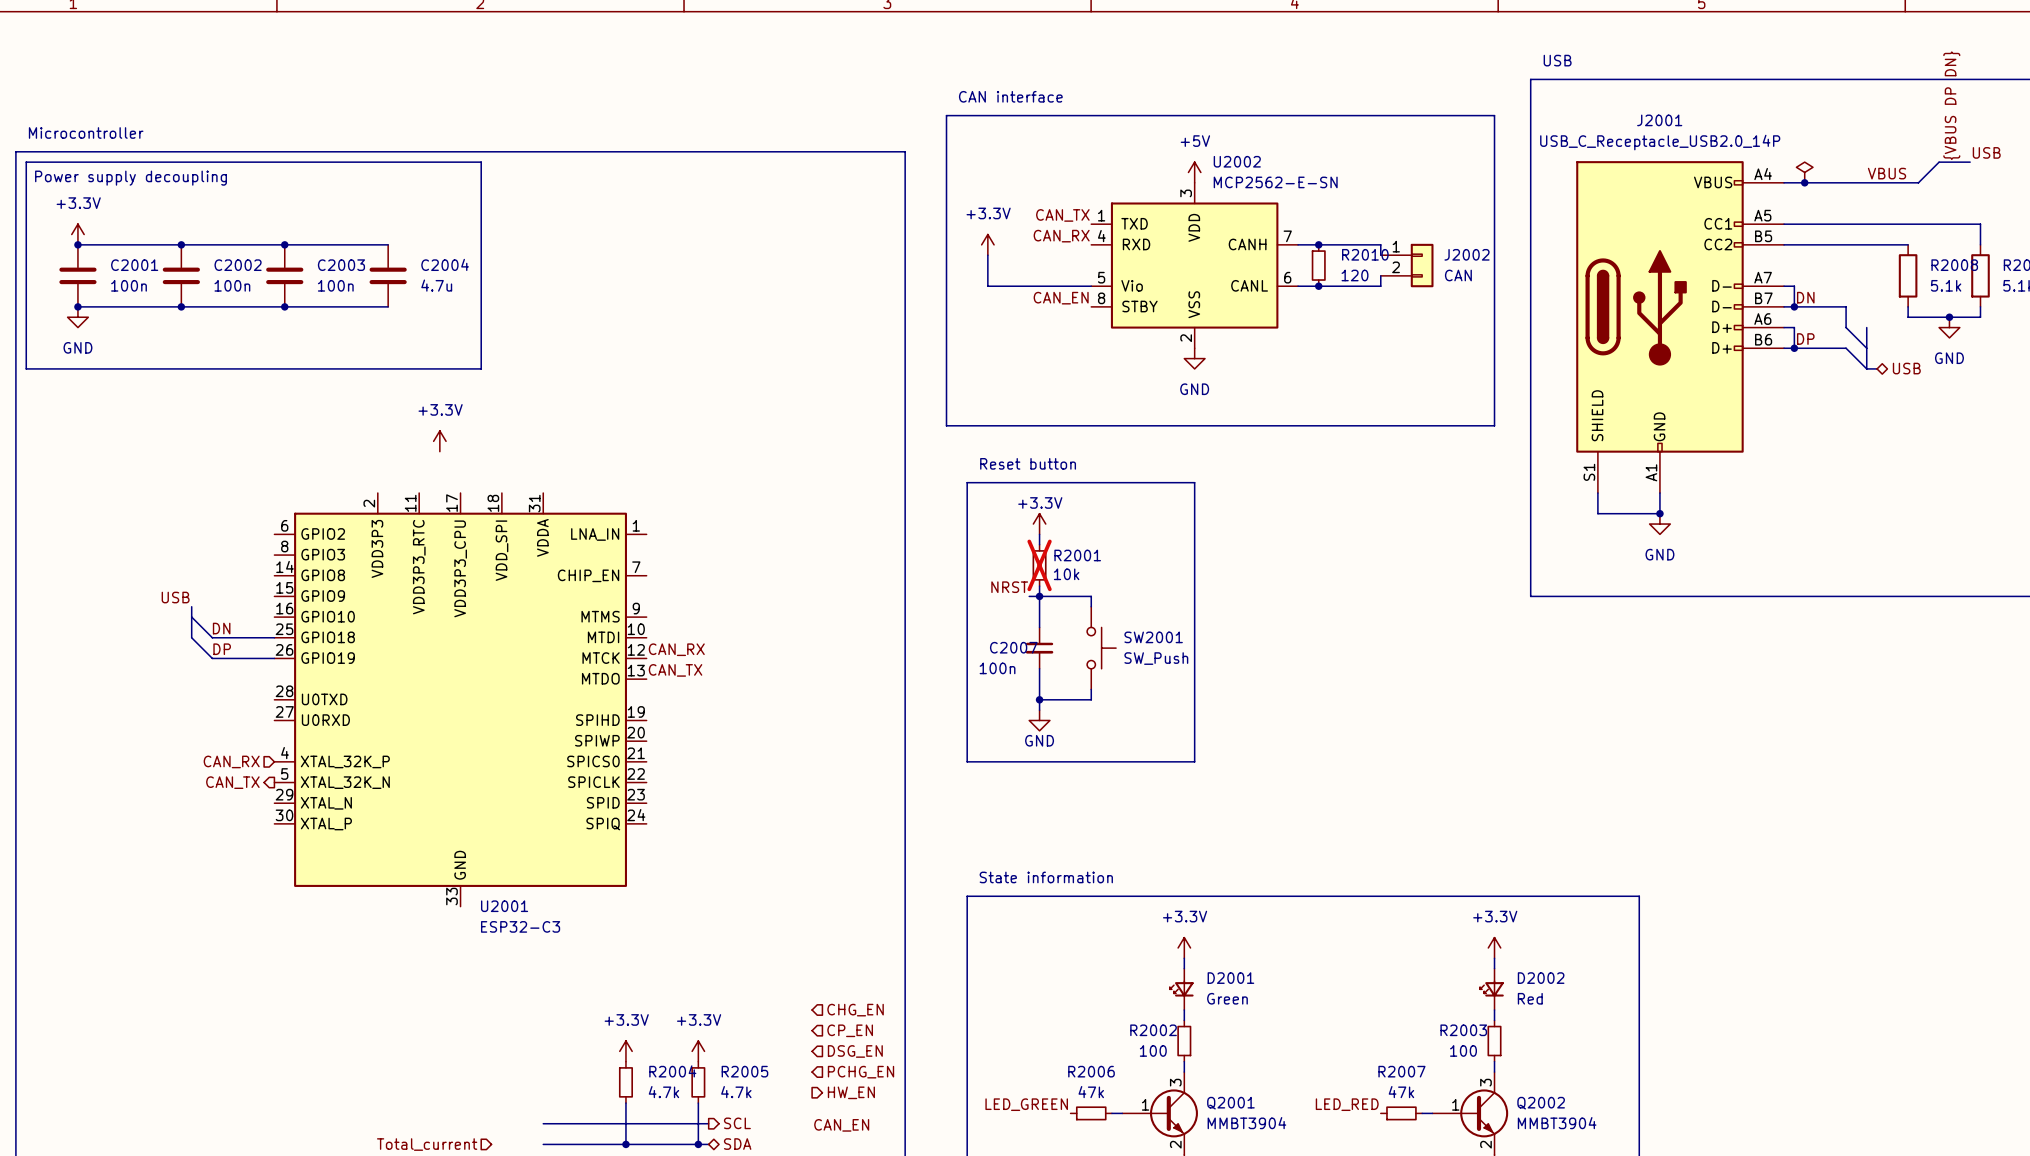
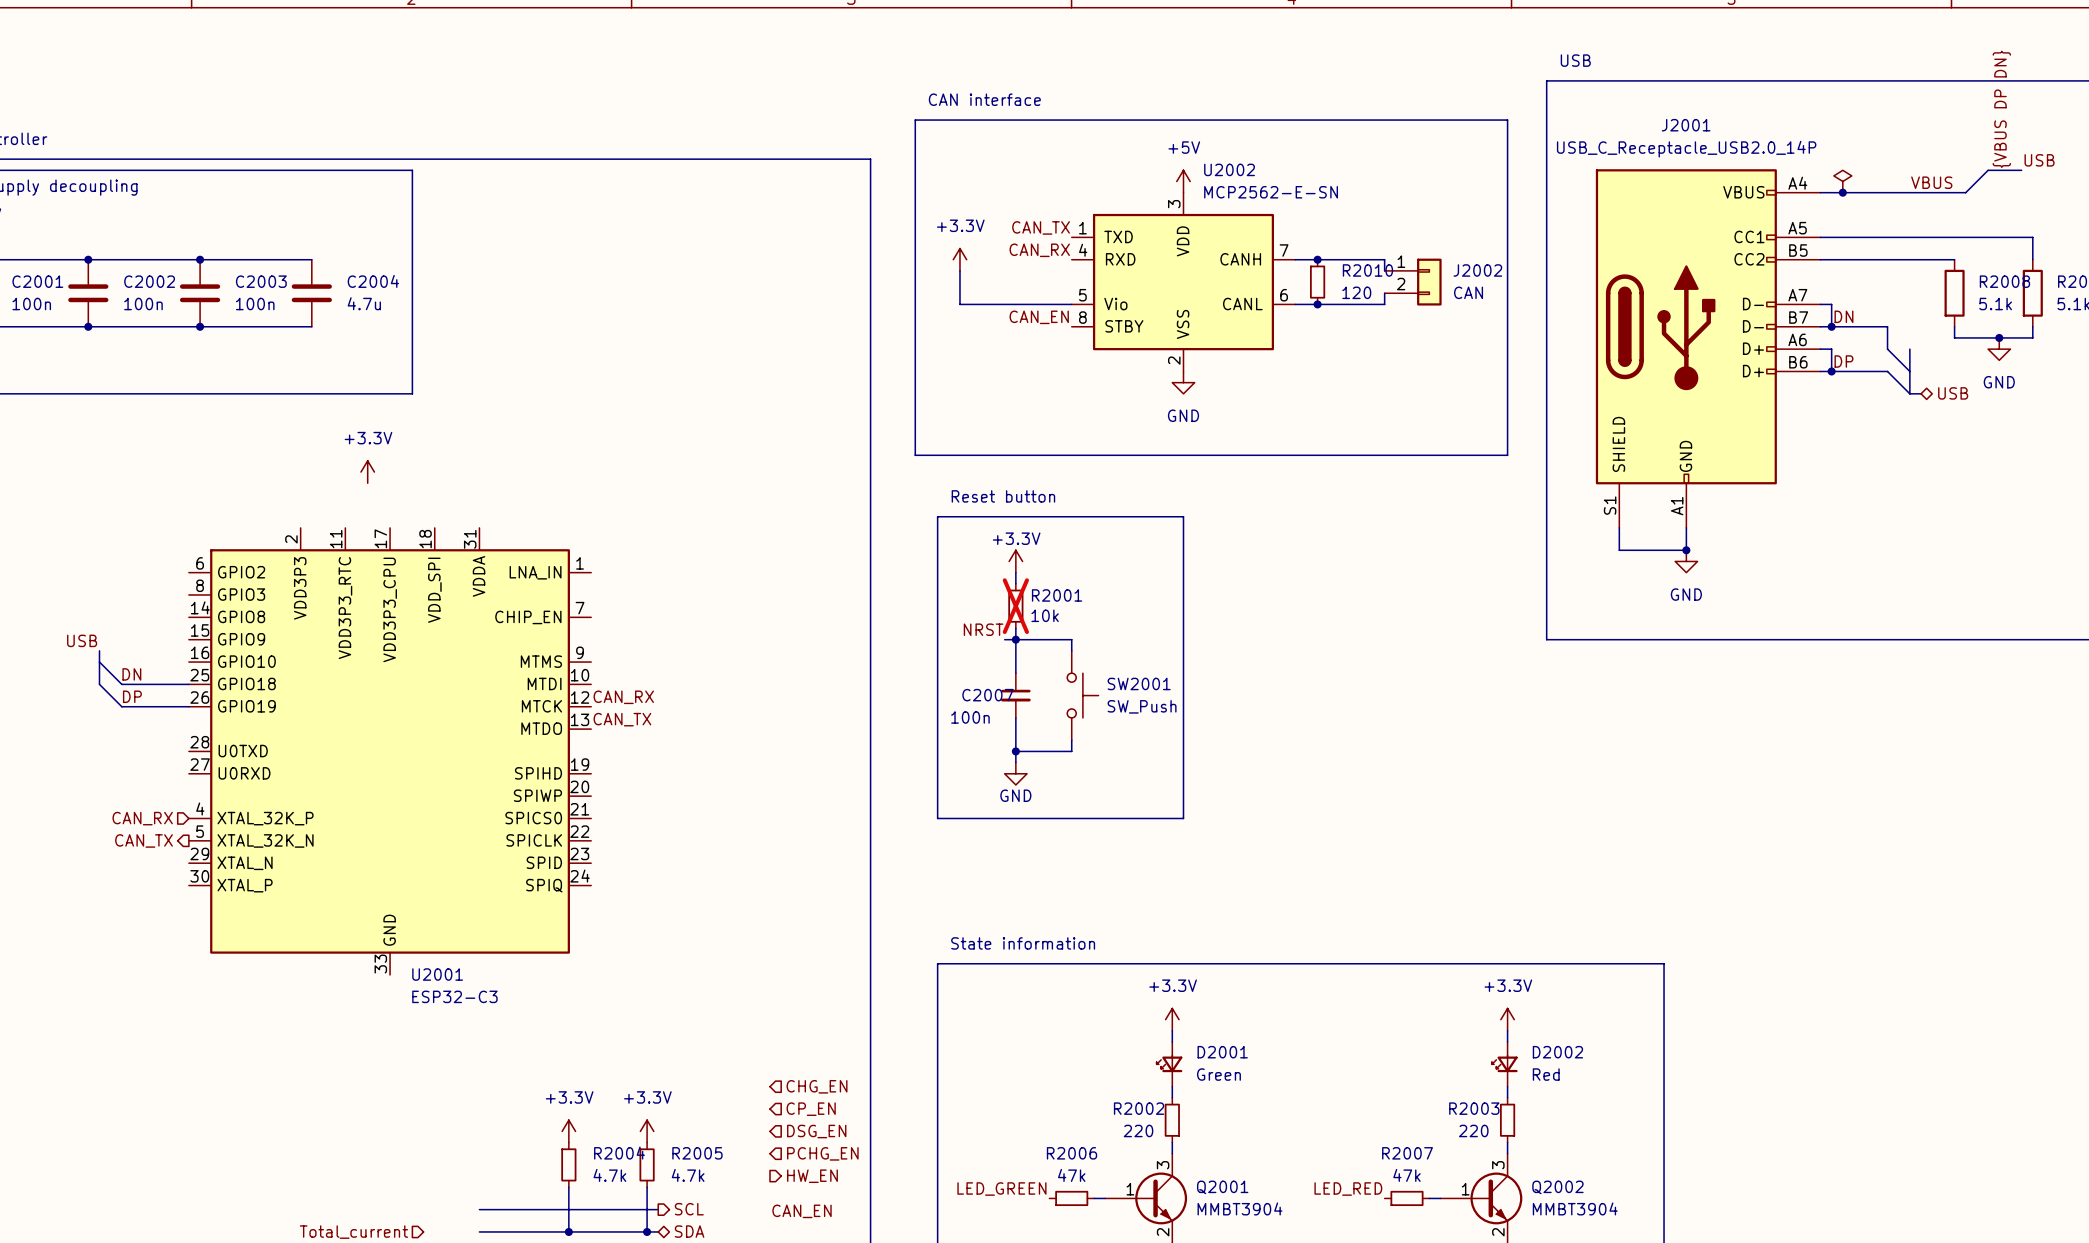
R2002 value: 100 (1153, 1050) -> 220 (1138, 1130)
R2003 value: 100 (1463, 1050) -> 220 (1473, 1130)

